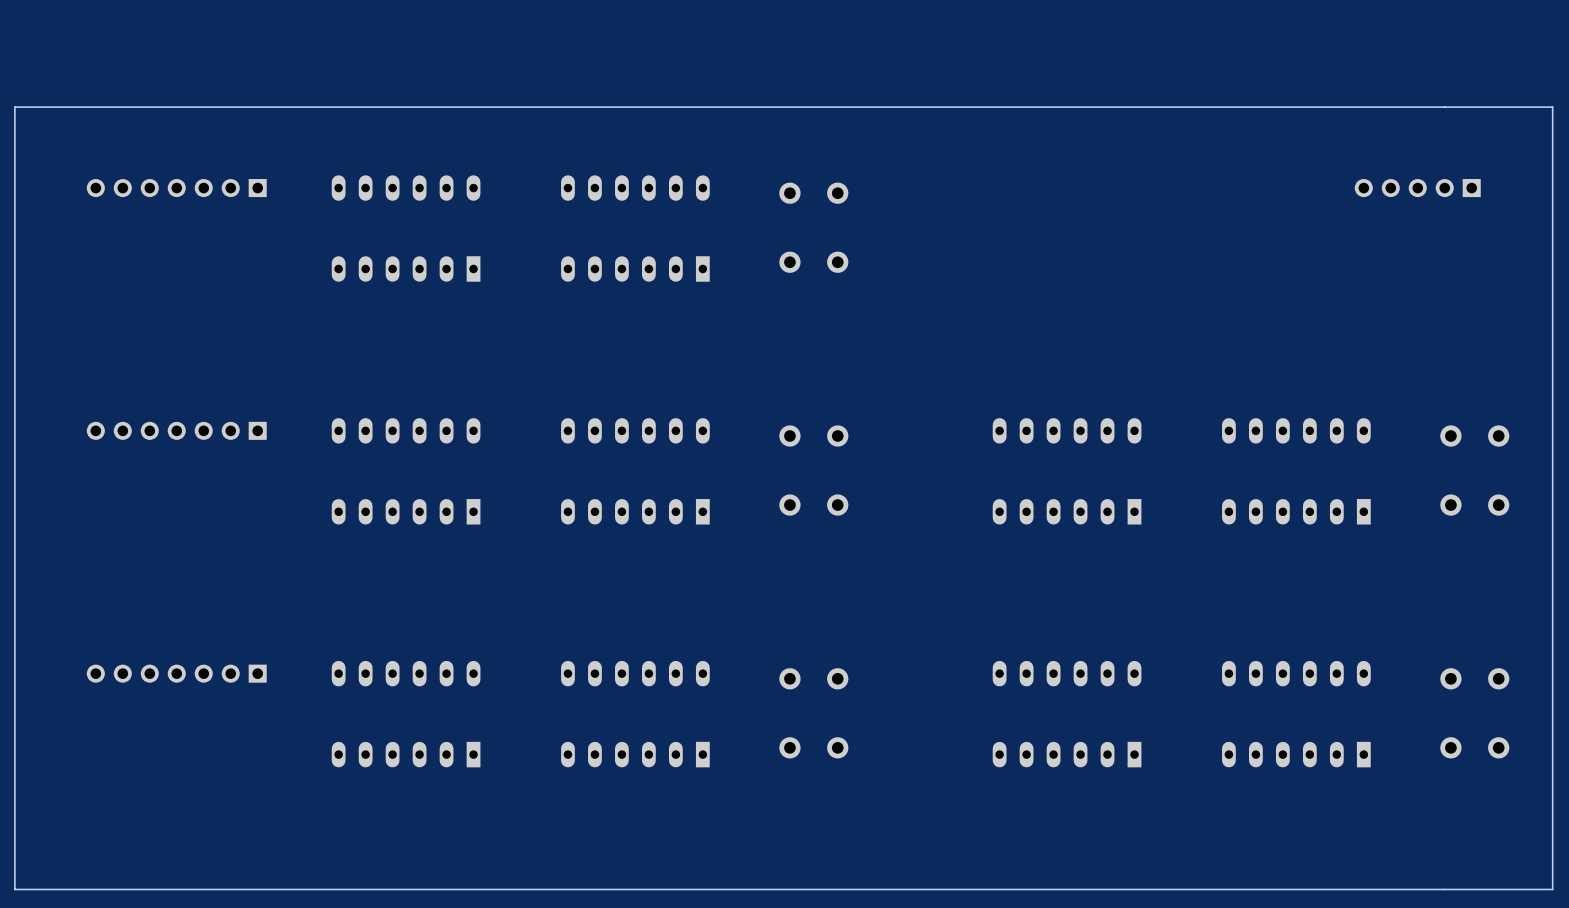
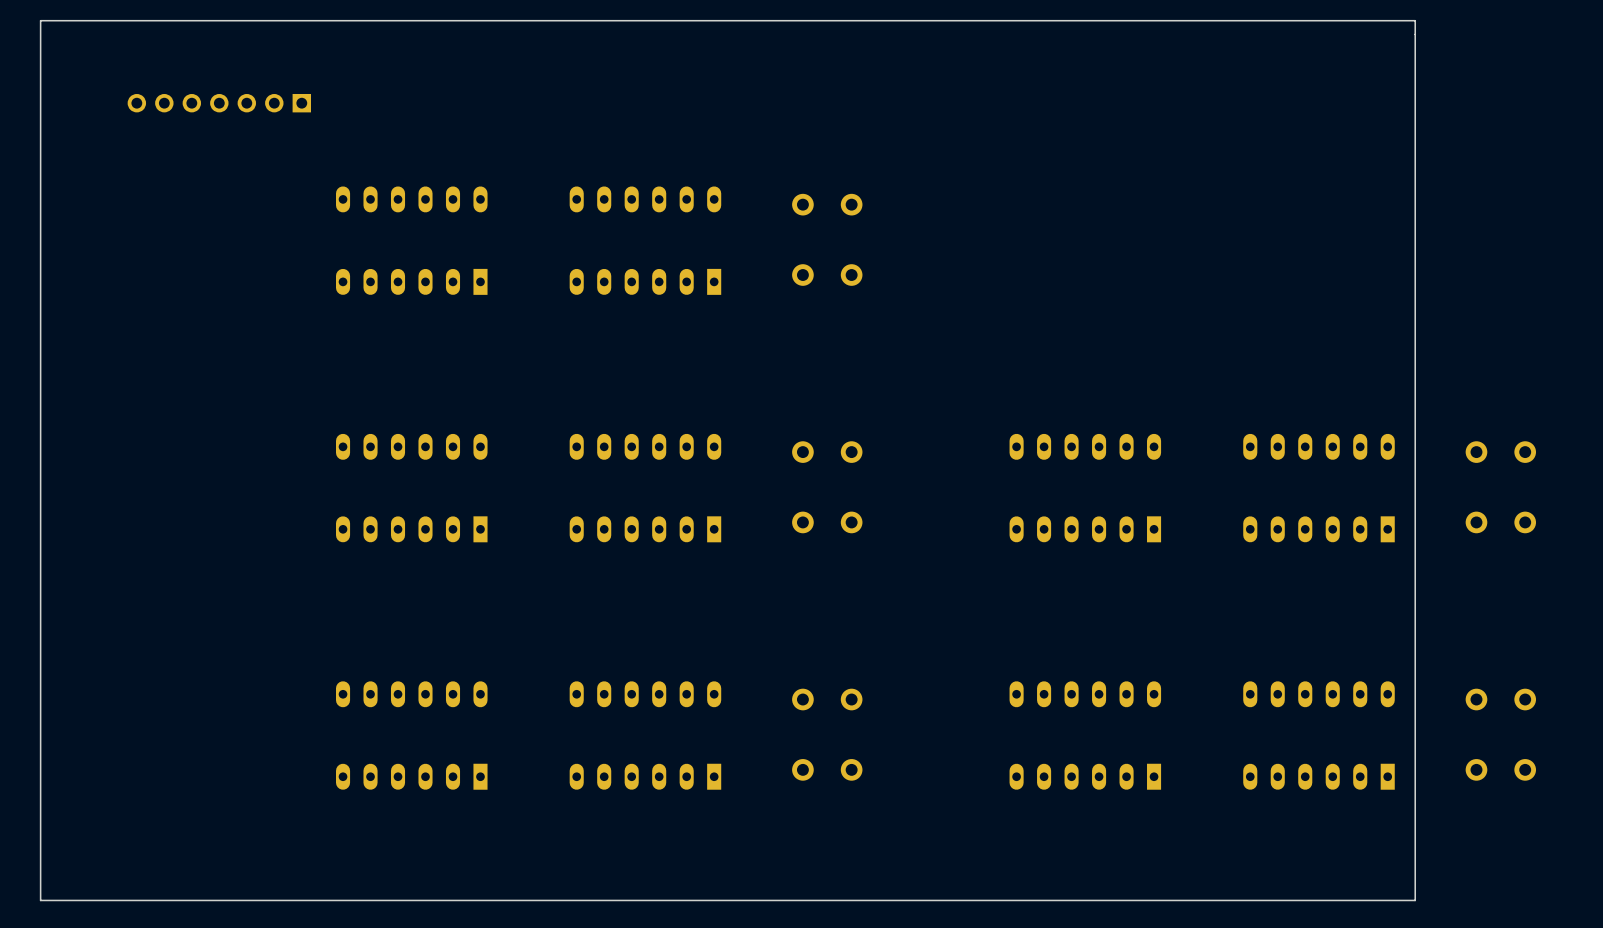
board edge: (1552, 107) (14, 107) (14, 889) (1552, 889) (1552, 107) -> (1415, 20) (1415, 900) (40, 900) (40, 20) (1415, 20)
part position: (176, 188) -> (219, 103)
part: (1417, 188) -> none
part: (176, 430) -> none
part: (176, 673) -> none

